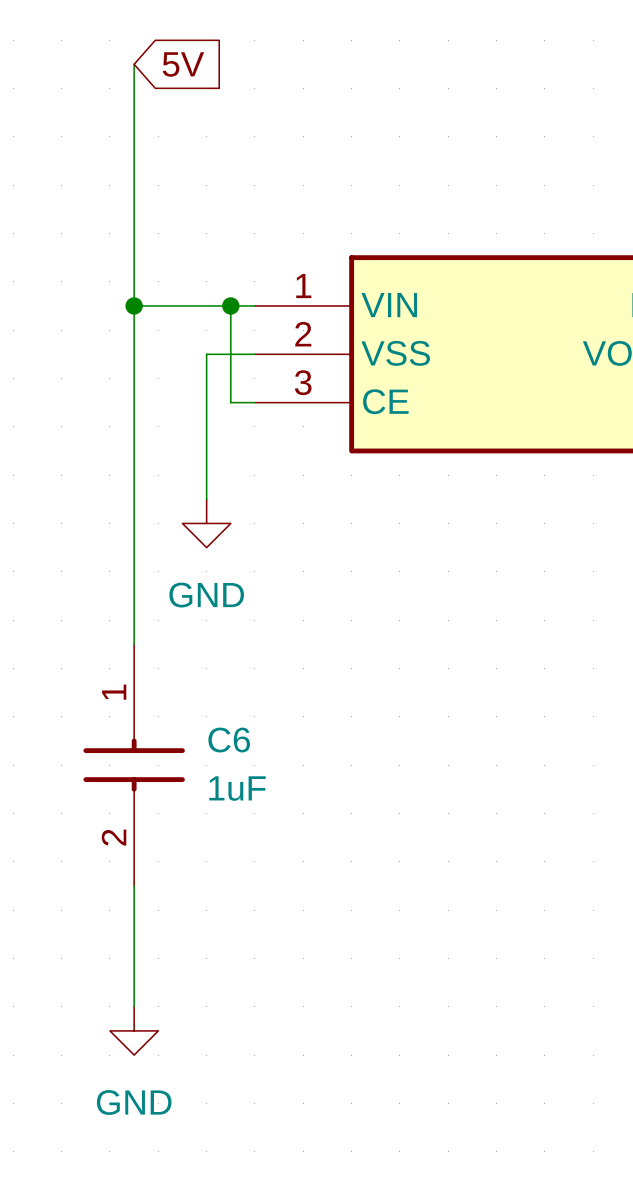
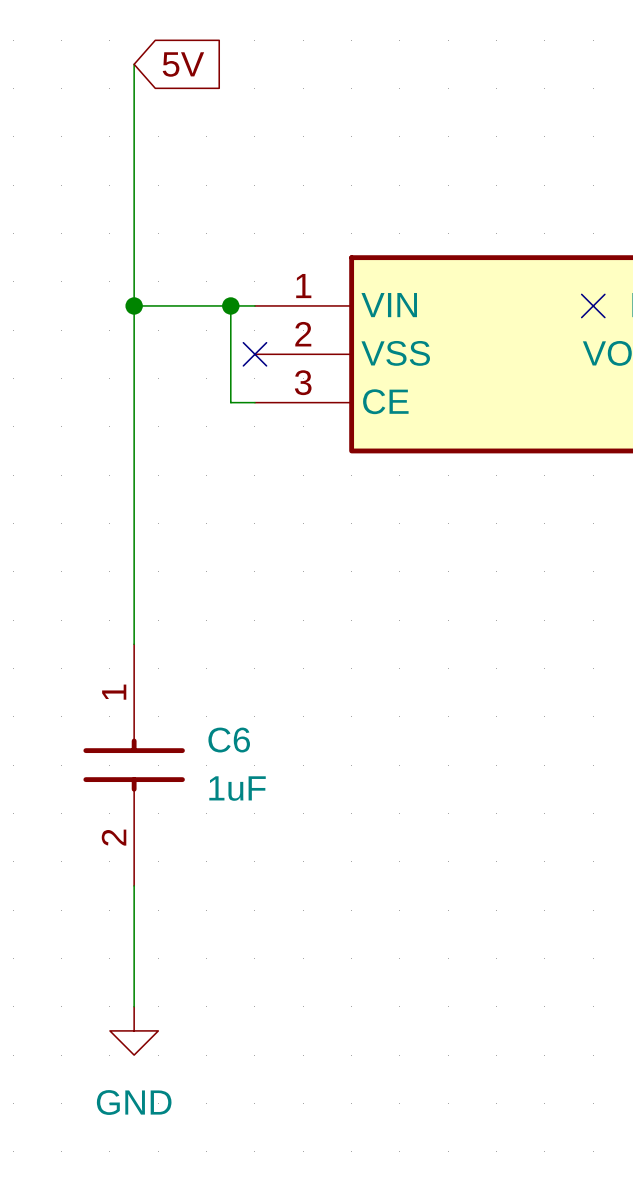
no-connect mark: none -> (593, 305)
wire: (254, 354) (206, 354) (206, 499) -> none
no-connect mark: none -> (254, 354)
power symbol: GND (206, 523) -> none

